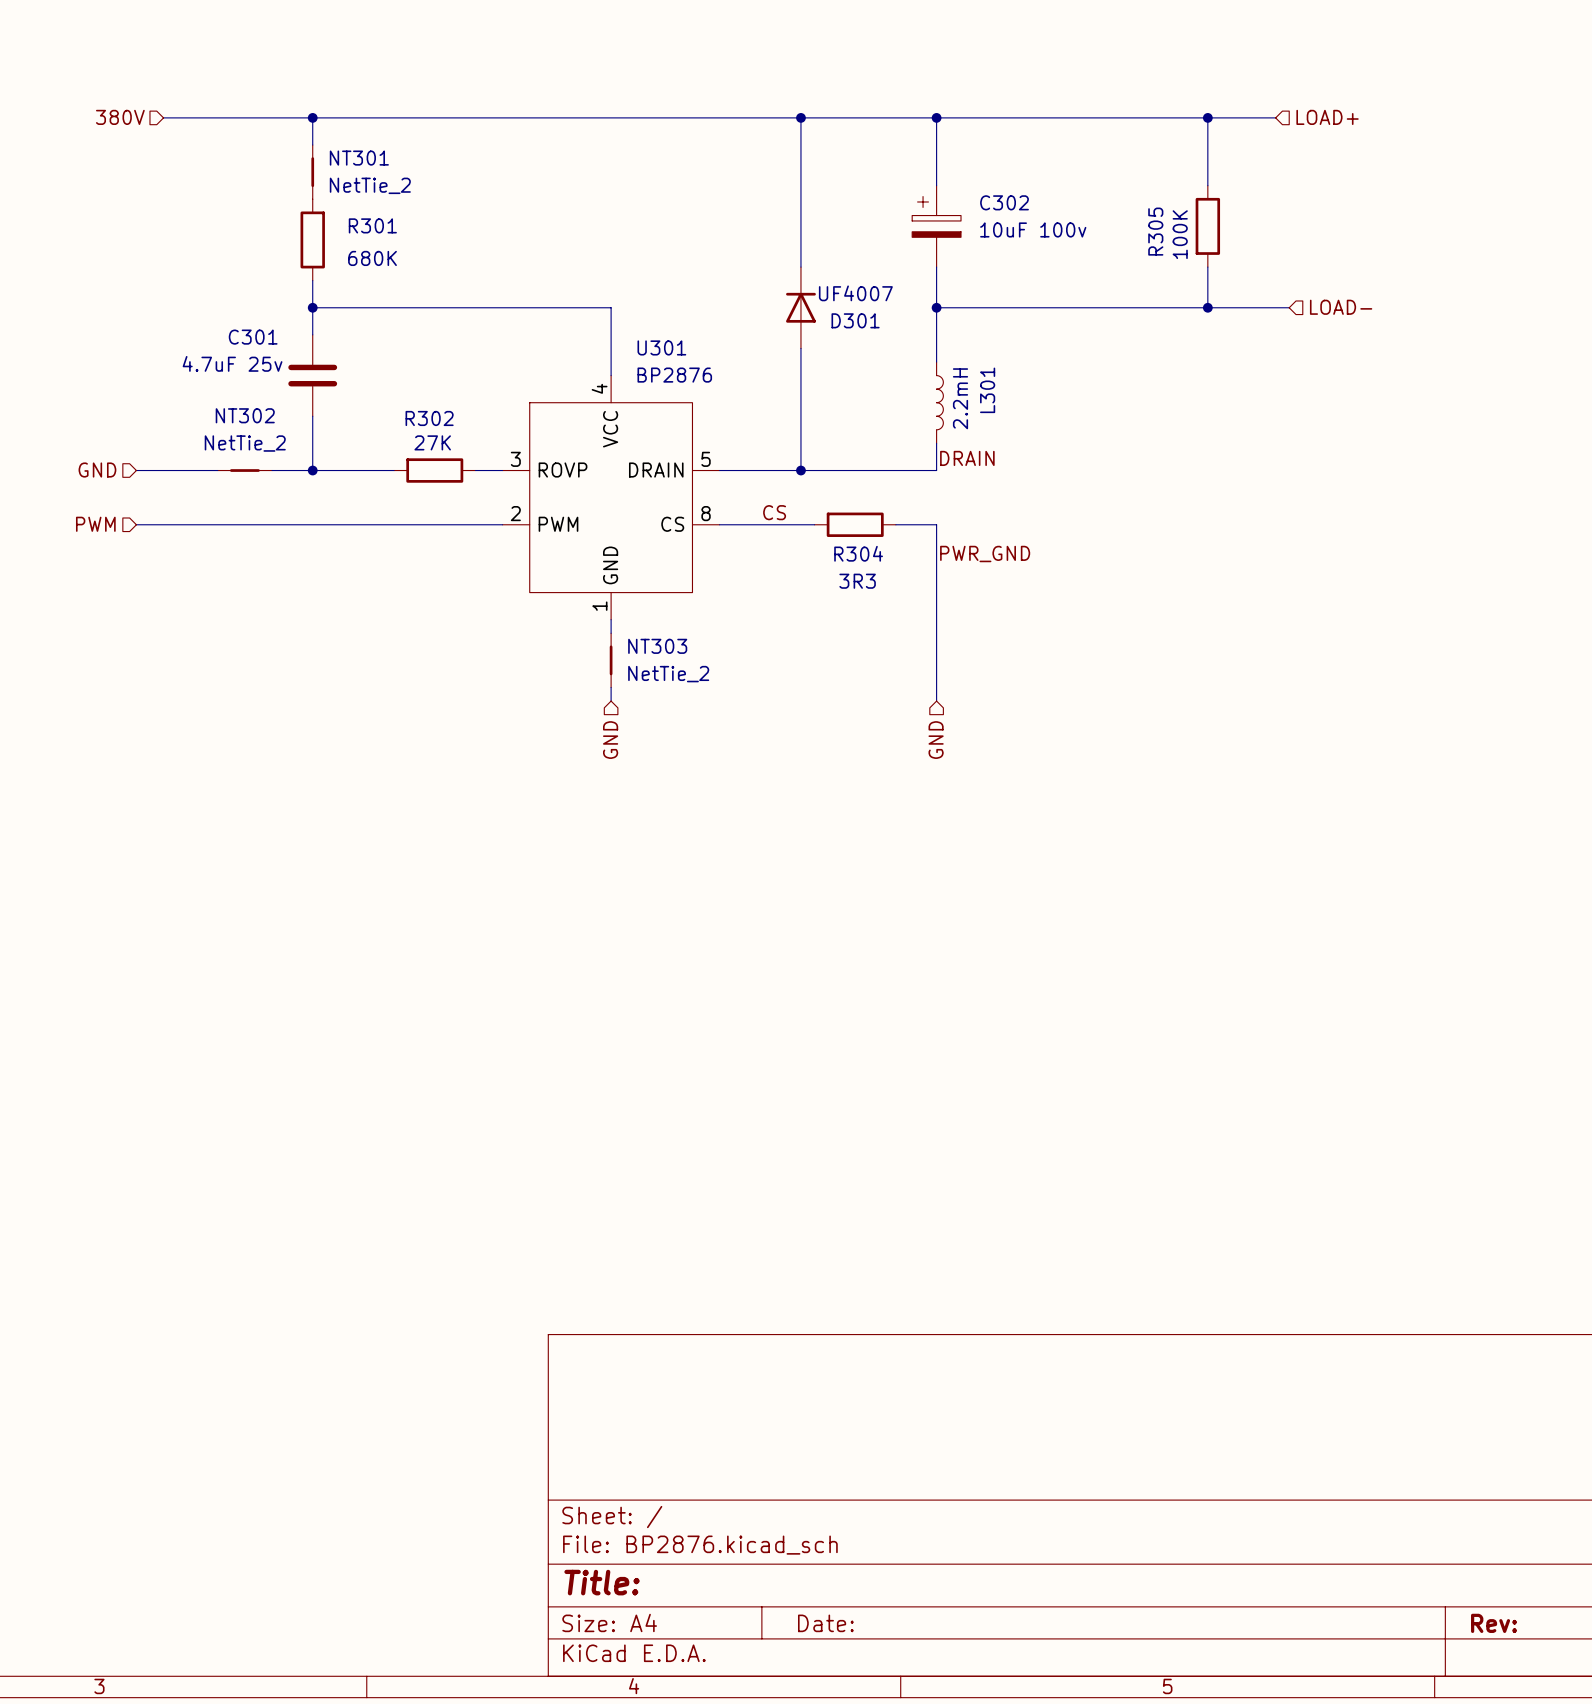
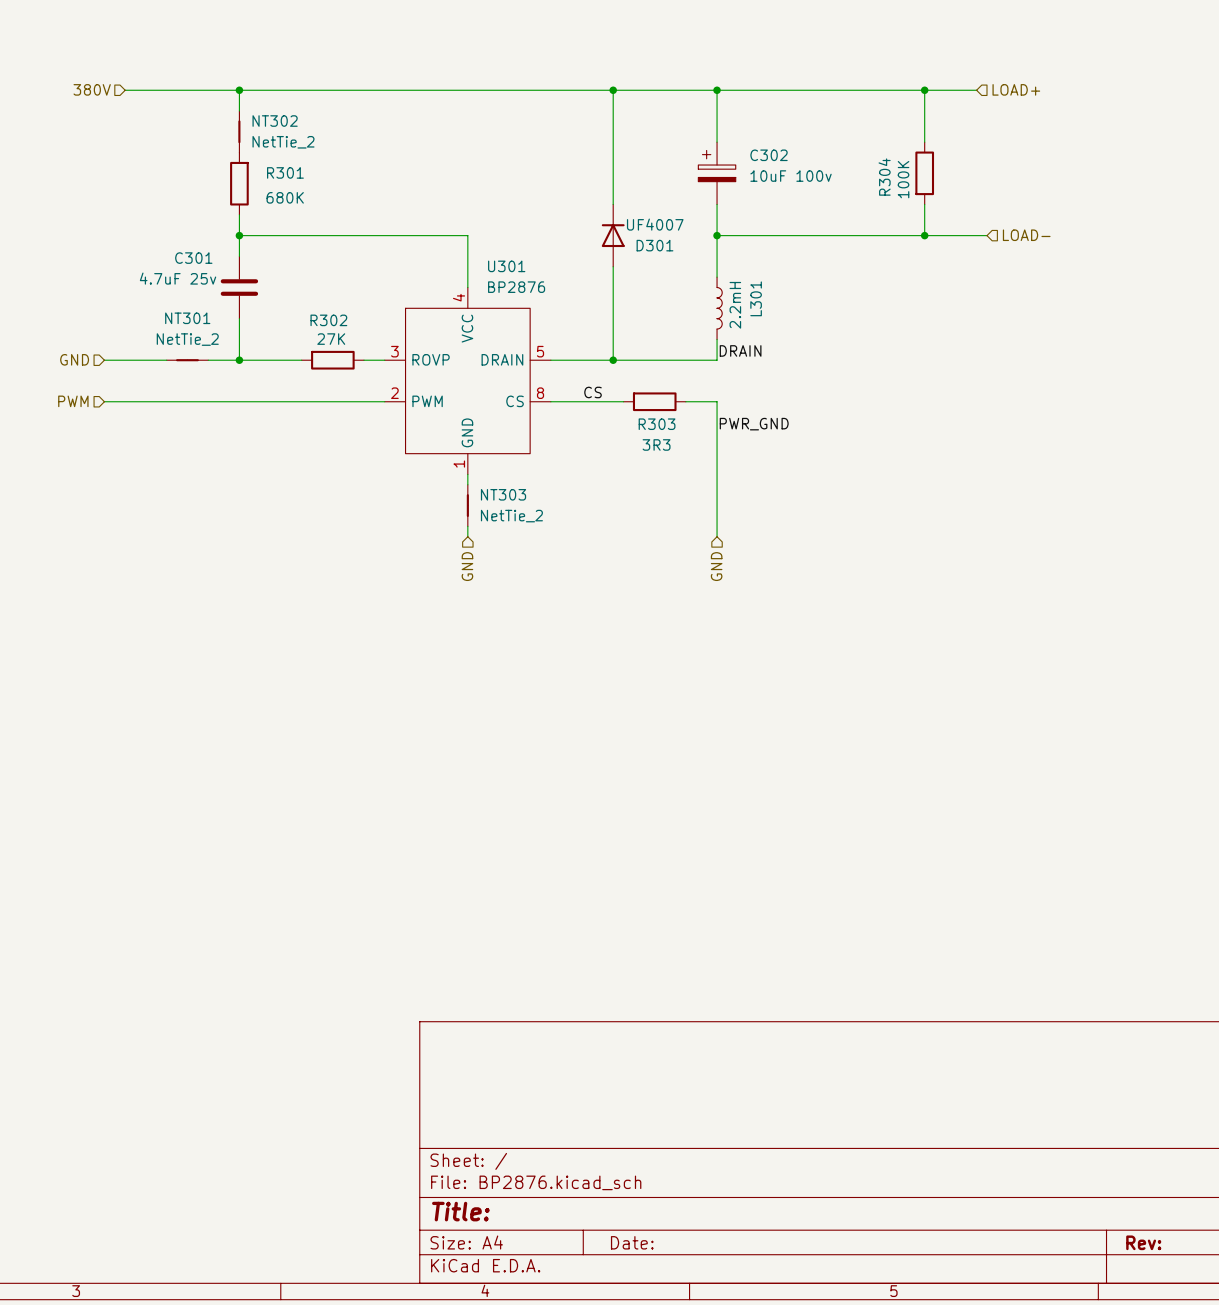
NT301 name: NT301 (359, 158) -> NT302 (275, 121)
R305 name: R305 (1155, 231) -> R304 (884, 177)
NT302 name: NT302 (245, 415) -> NT301 (187, 318)
R304 name: R304 (858, 553) -> R303 (657, 424)

